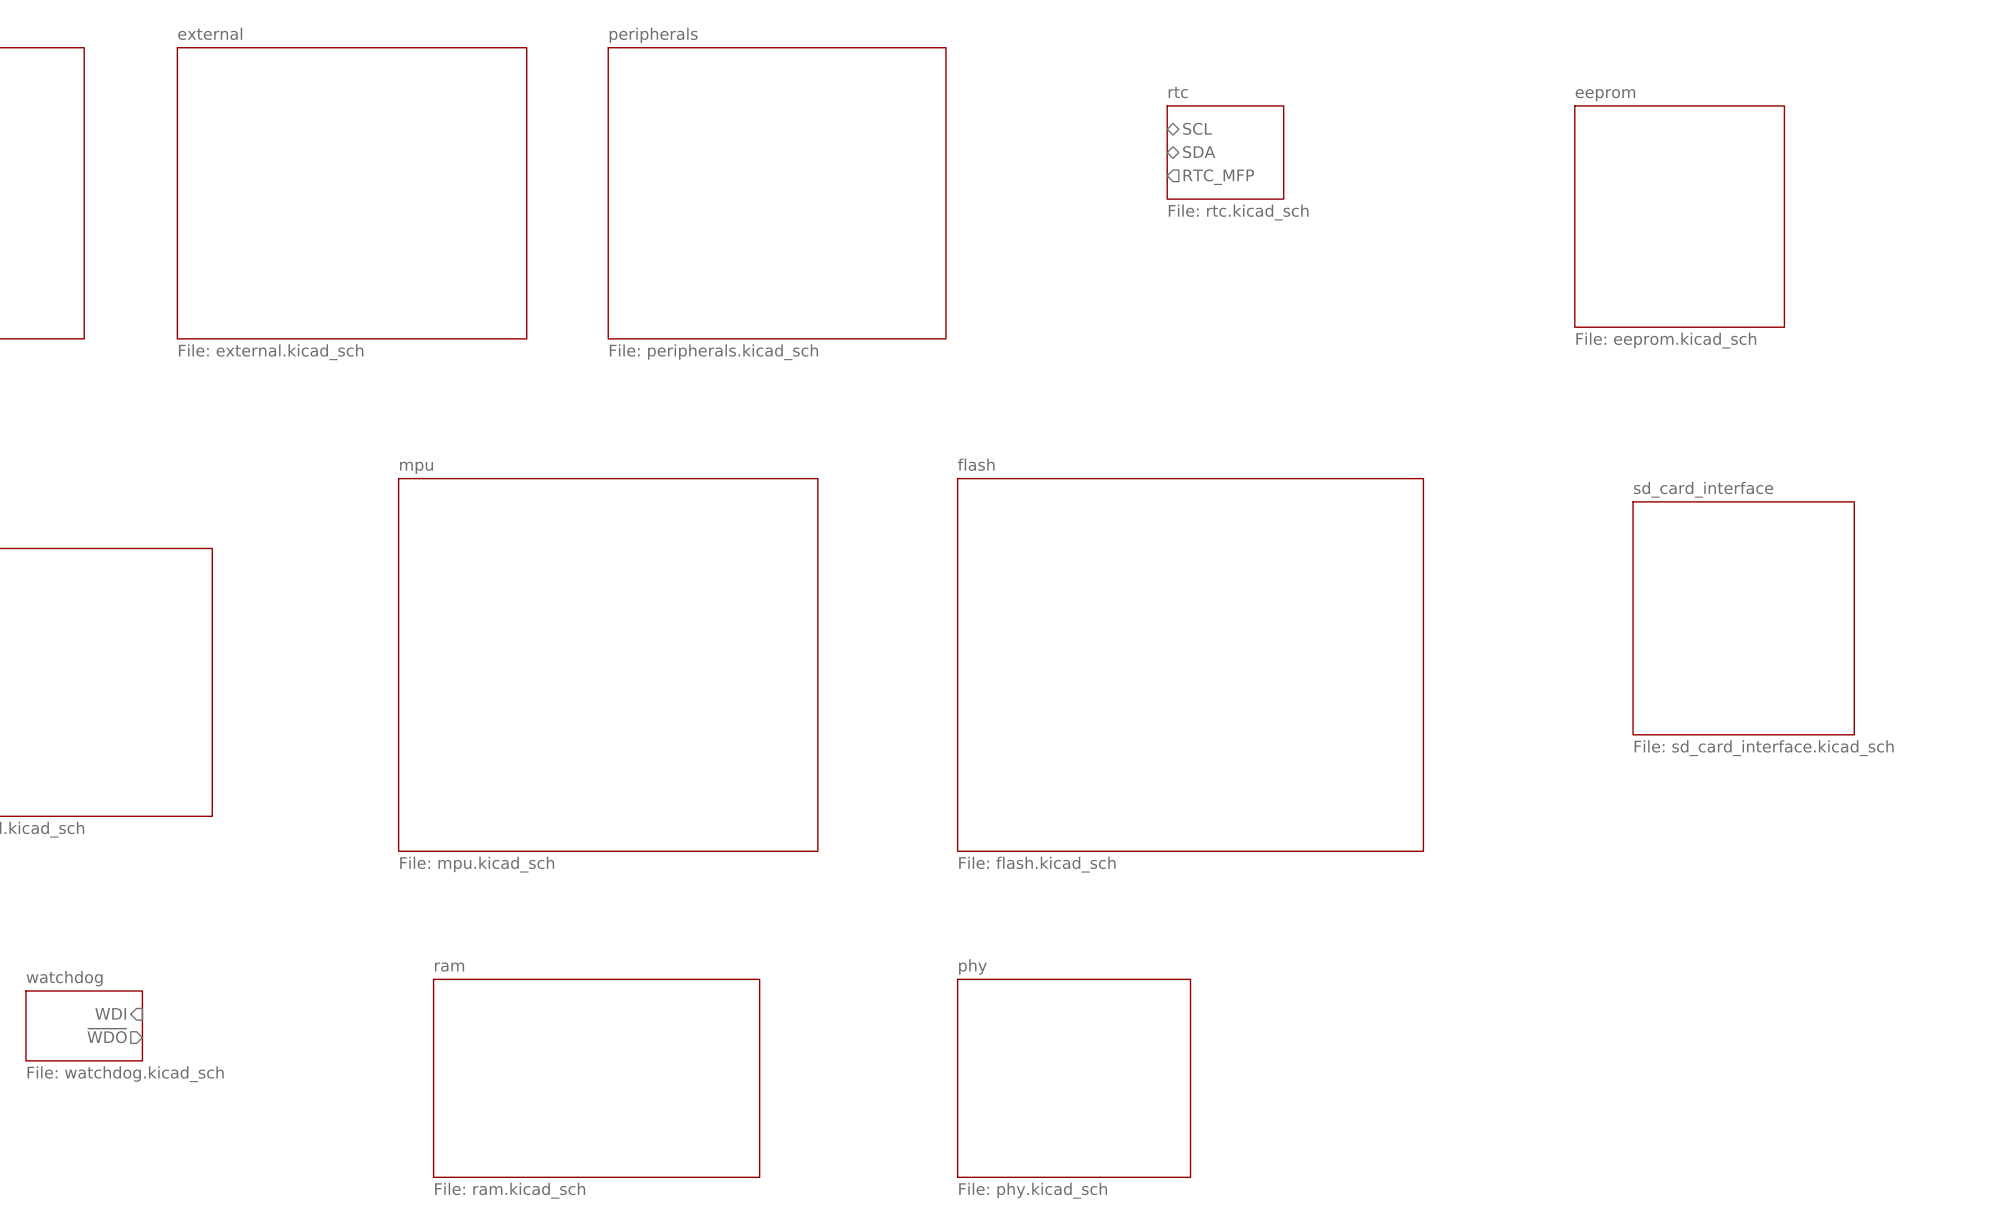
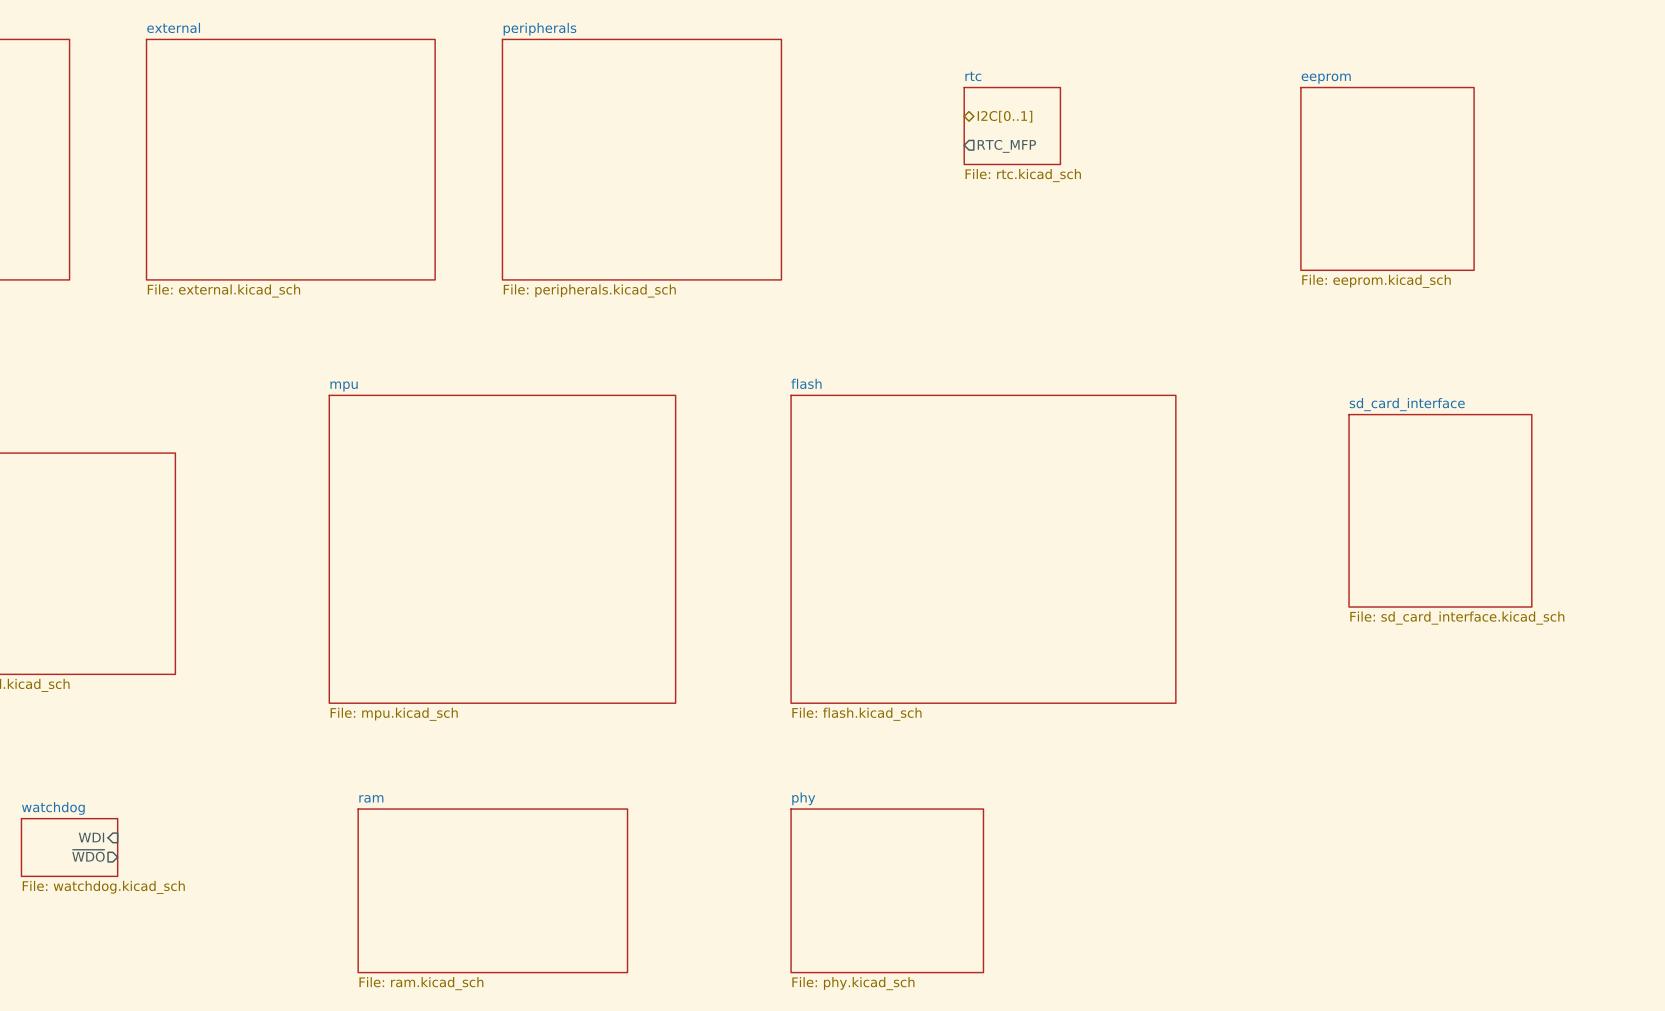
sheet pin: SCL (1197, 128) -> none
hierarchical label: none -> I2C[0..1] (1005, 116)
sheet pin: SDA (1199, 152) -> none

